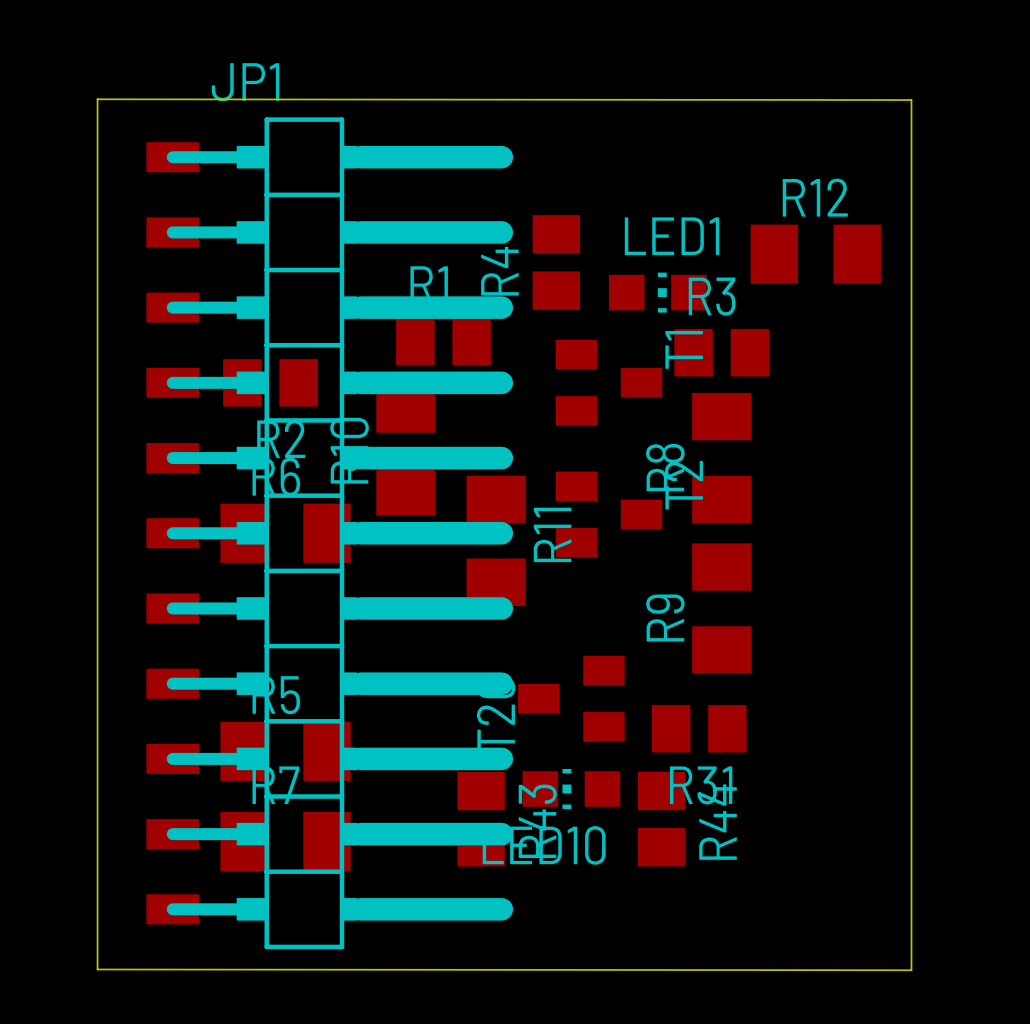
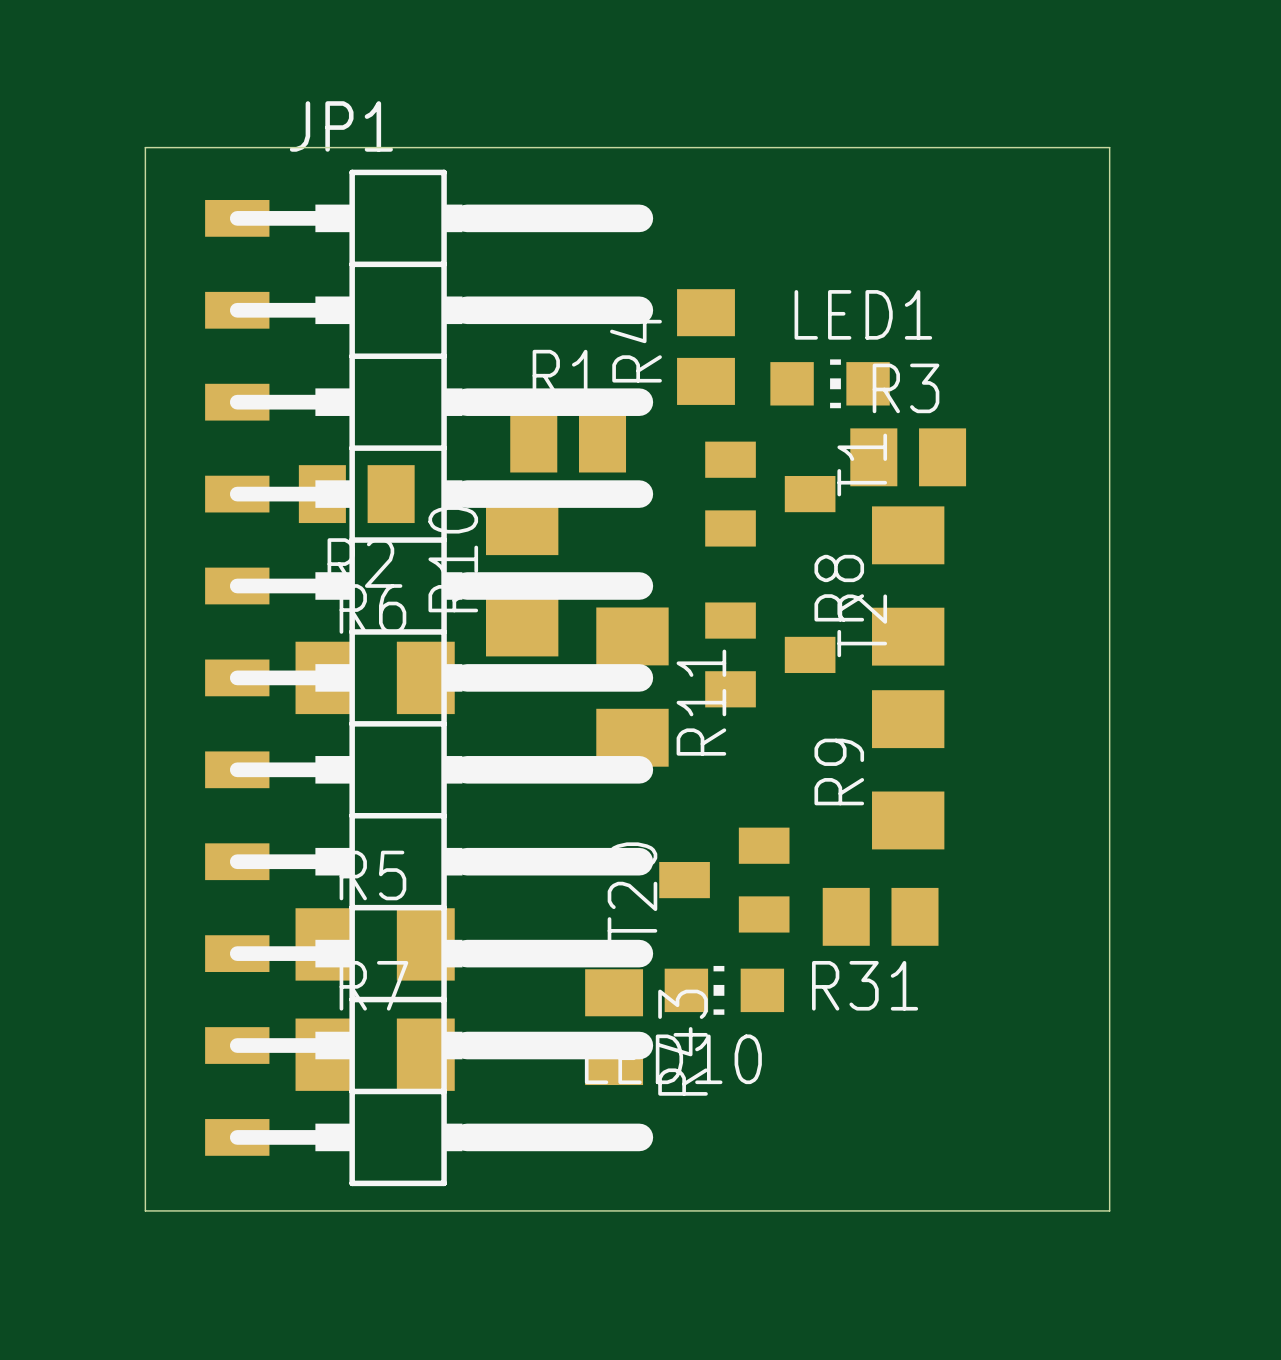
board edge: (97, 99) (911, 100) (911, 970) (97, 969) -> (145, 147) (1109, 147) (1109, 1210) (145, 1210)
R12: (815, 254) -> none
R44: (661, 819) -> none

